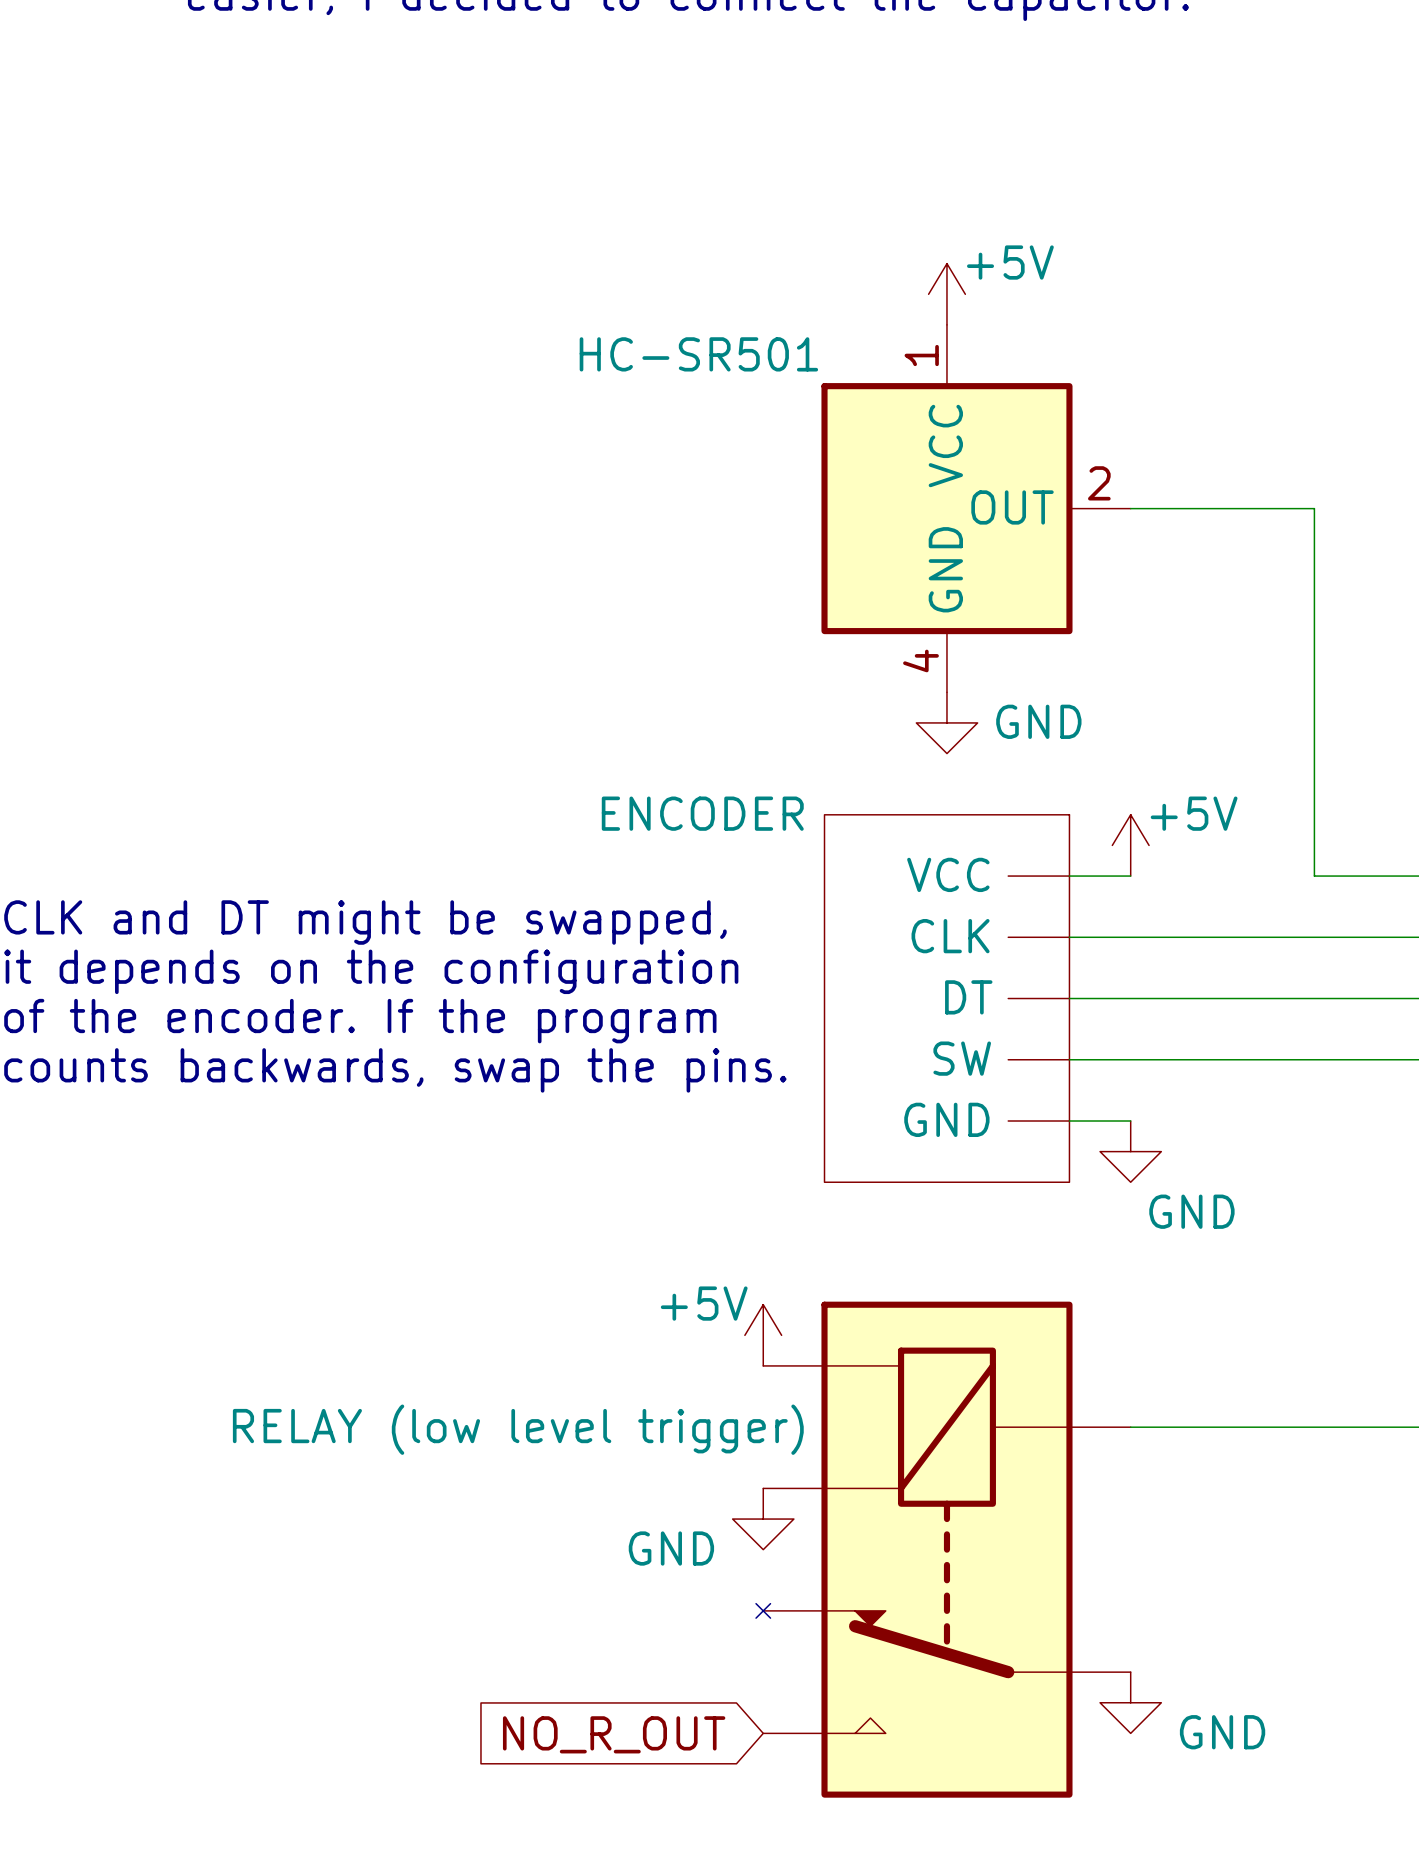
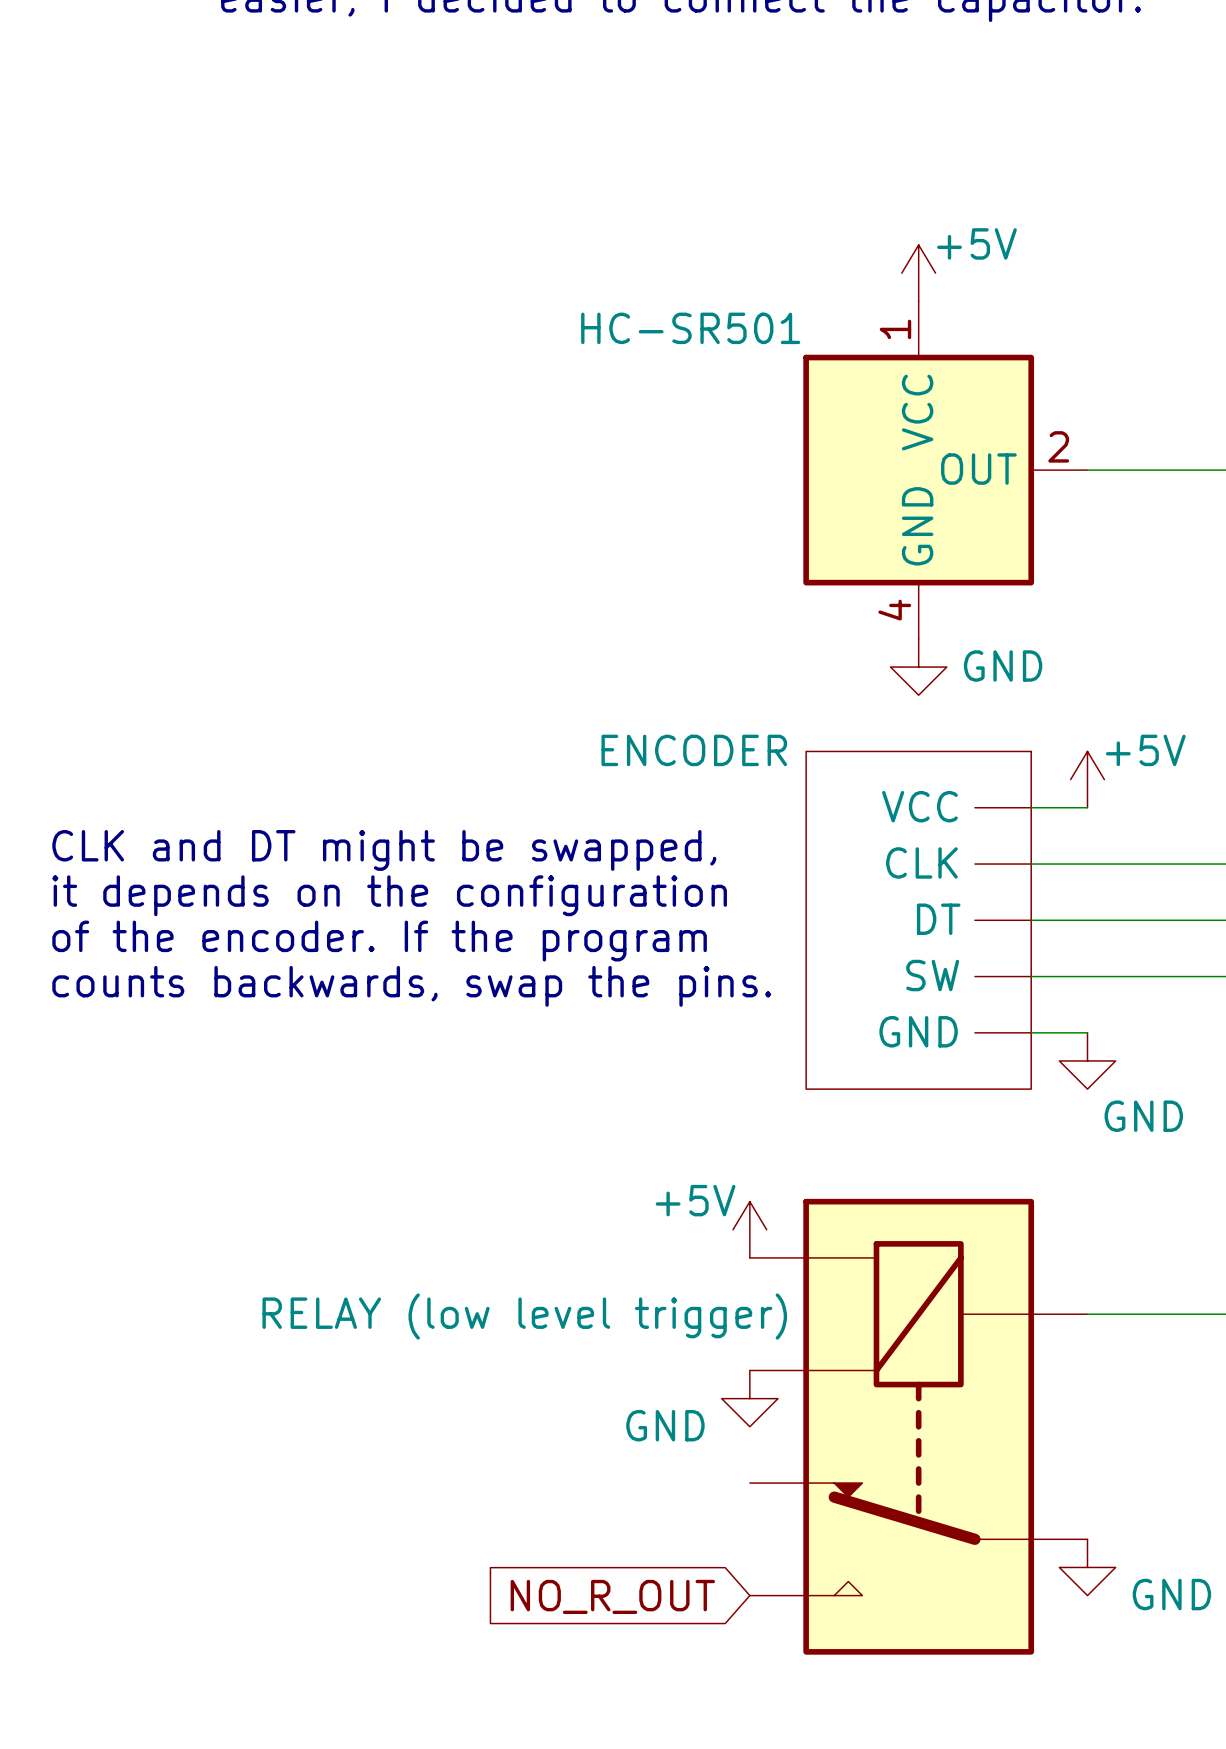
part symbol: [756, 1301, 1131, 1798] -> [749, 1198, 1088, 1655]

